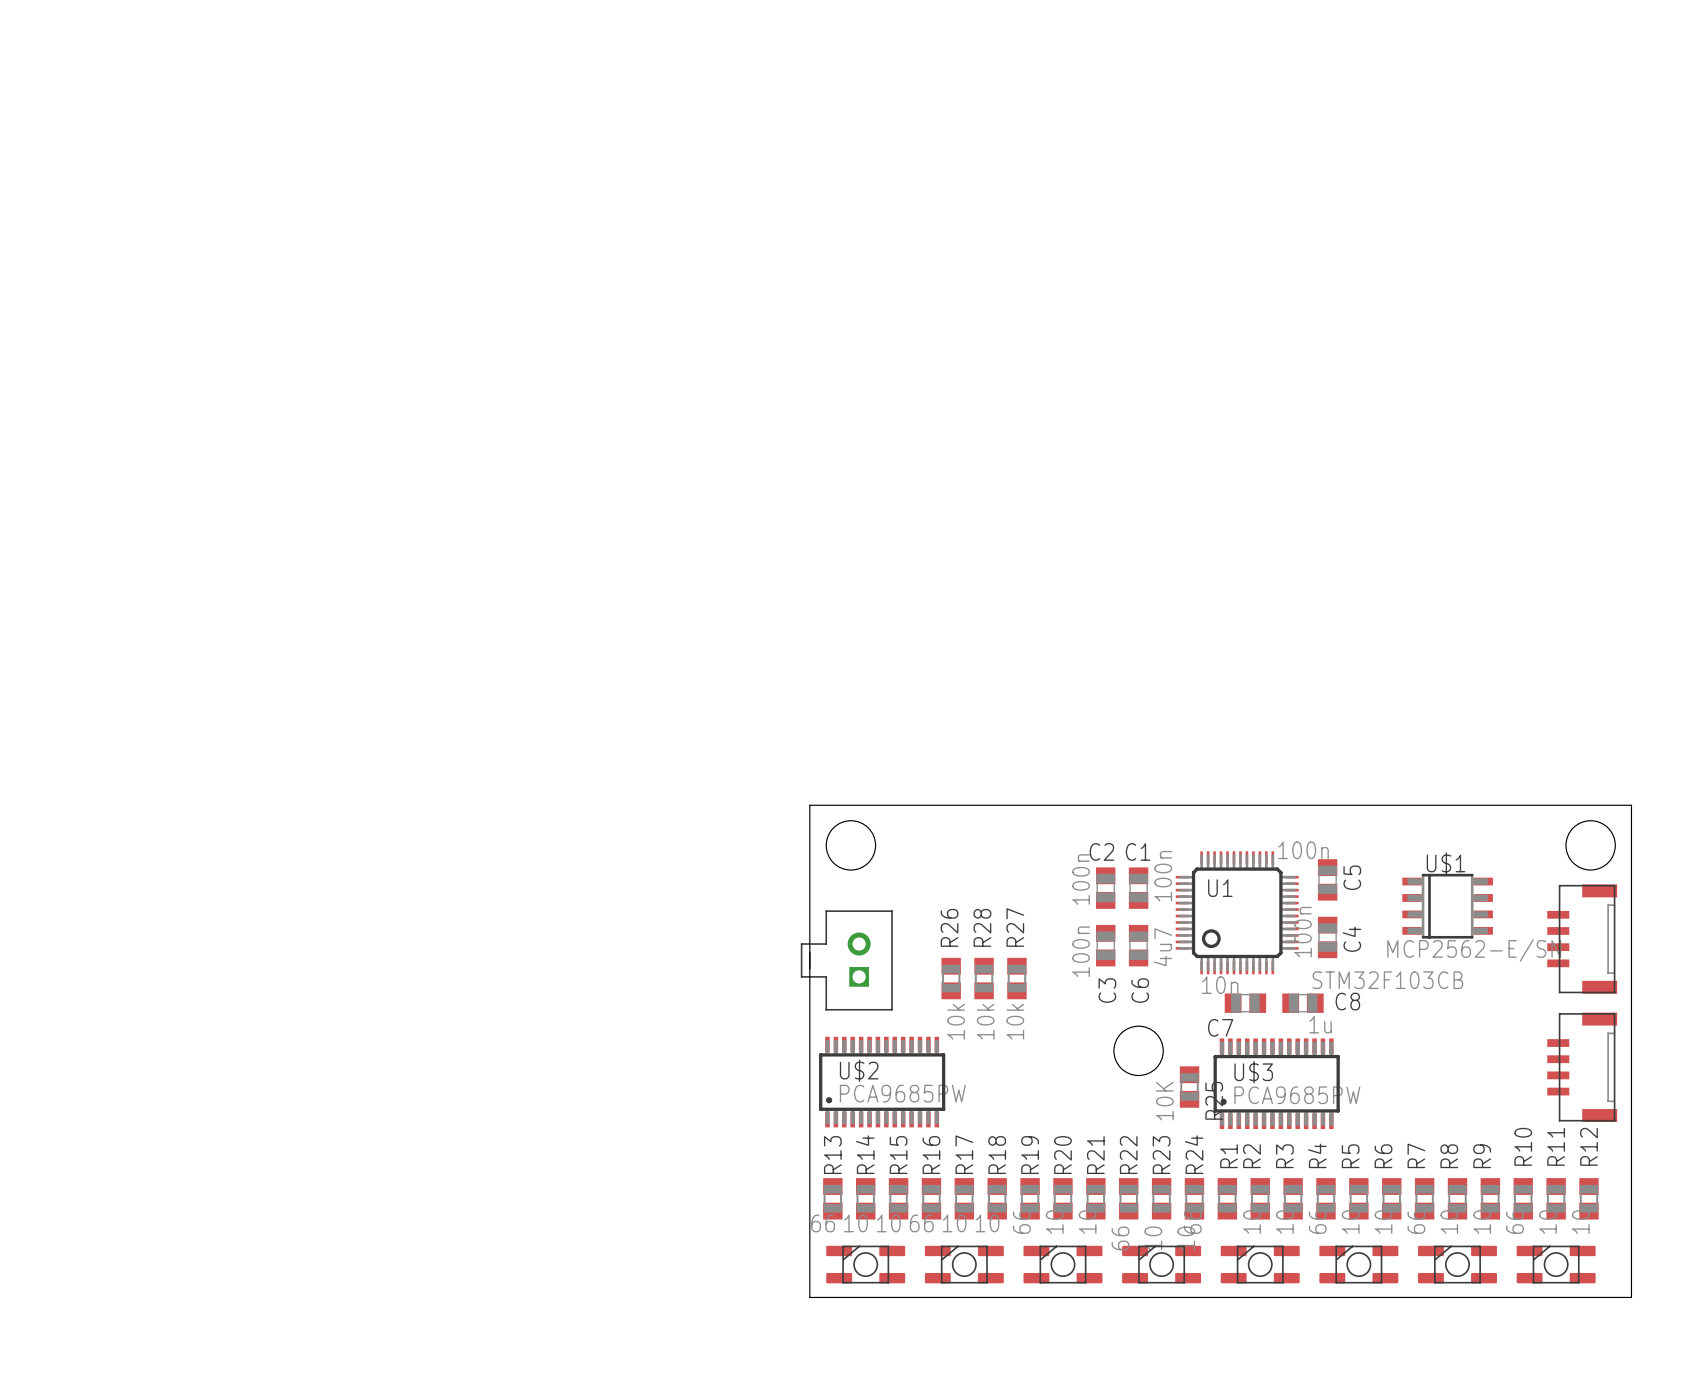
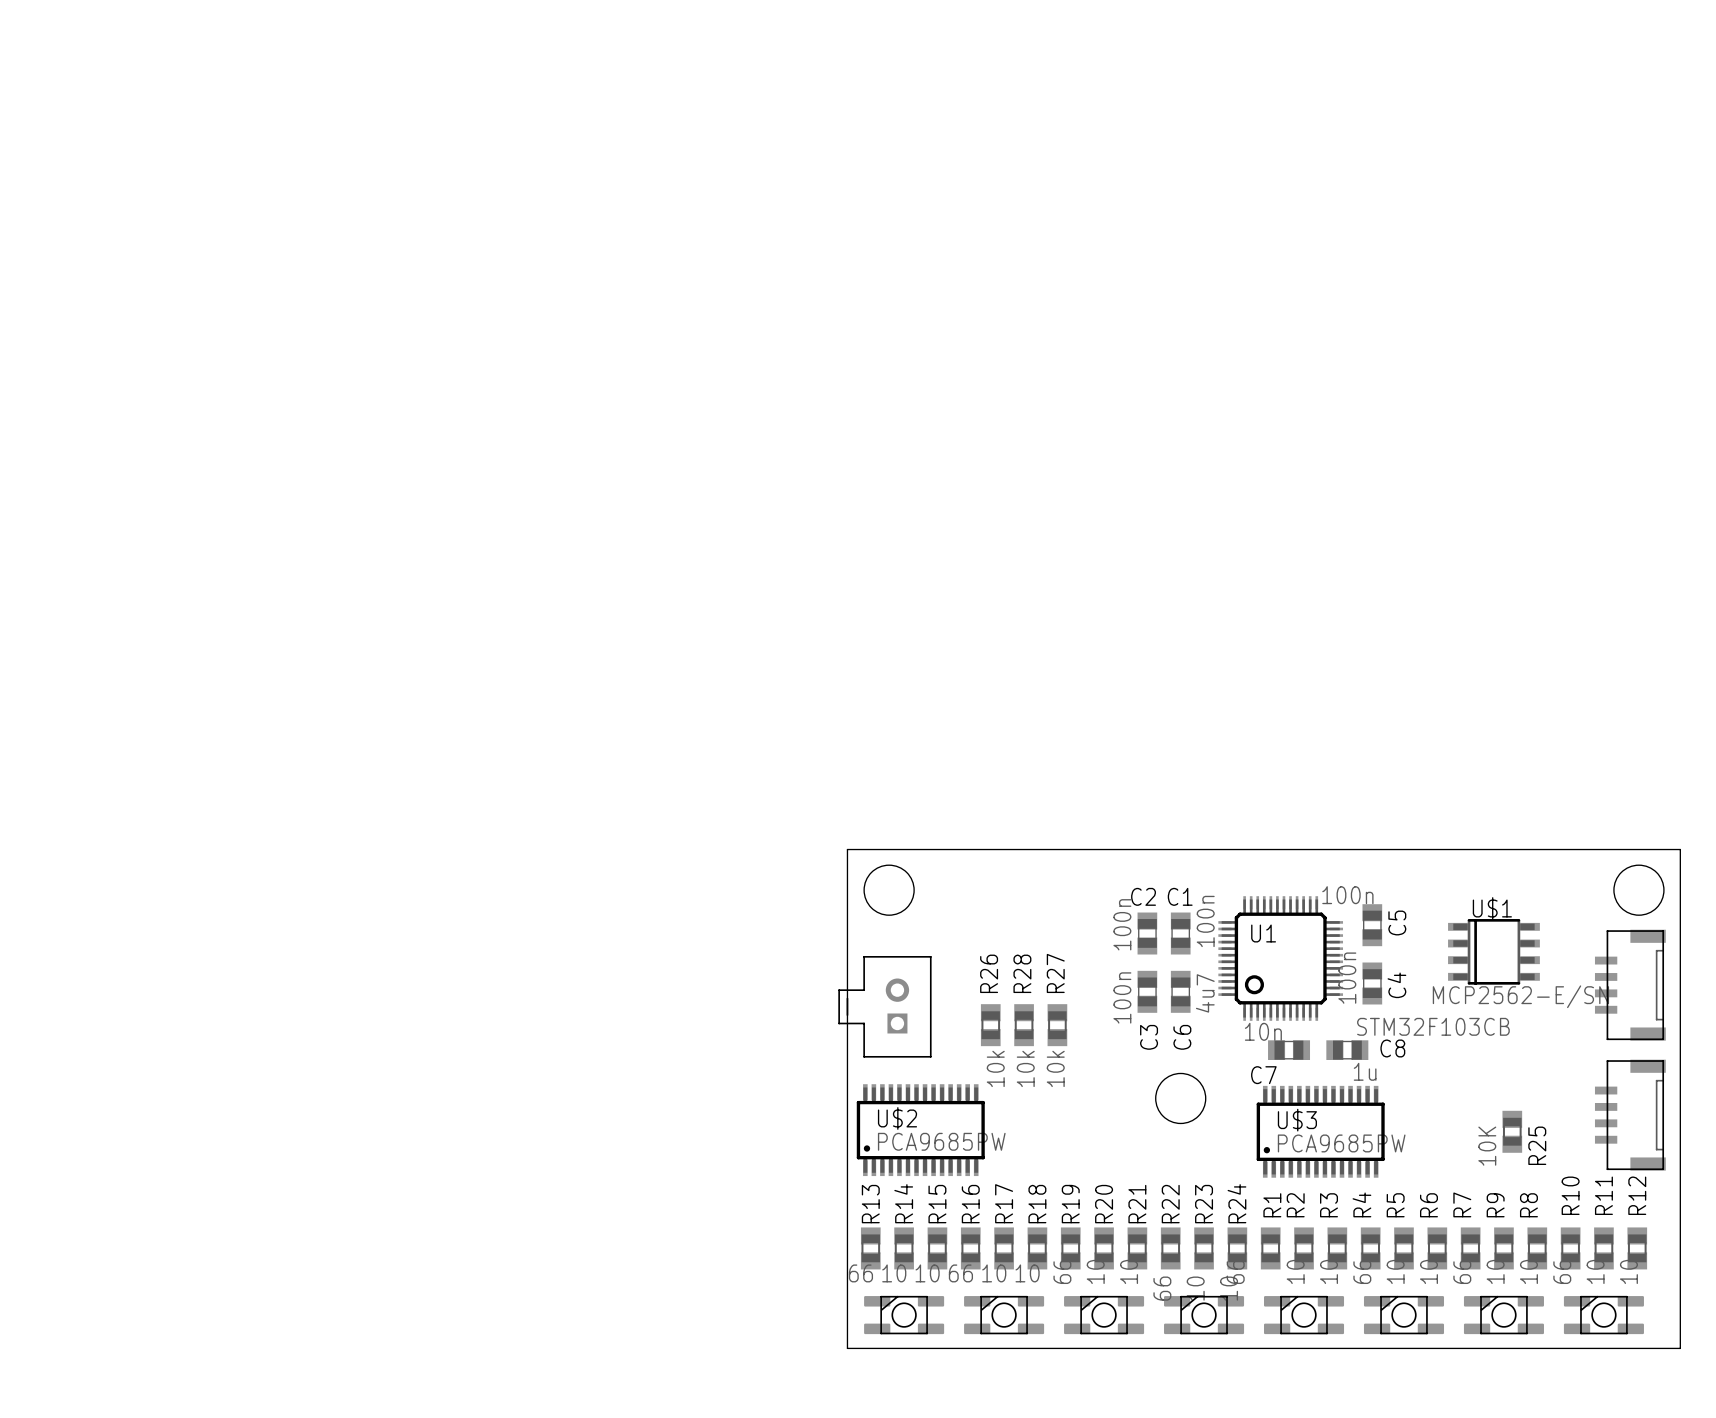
R25 position: (1189, 1087) -> (1512, 1131)
R8 name: R8 (1449, 1156) -> R9 (1495, 1205)
R9 name: R9 (1482, 1156) -> R8 (1528, 1205)

